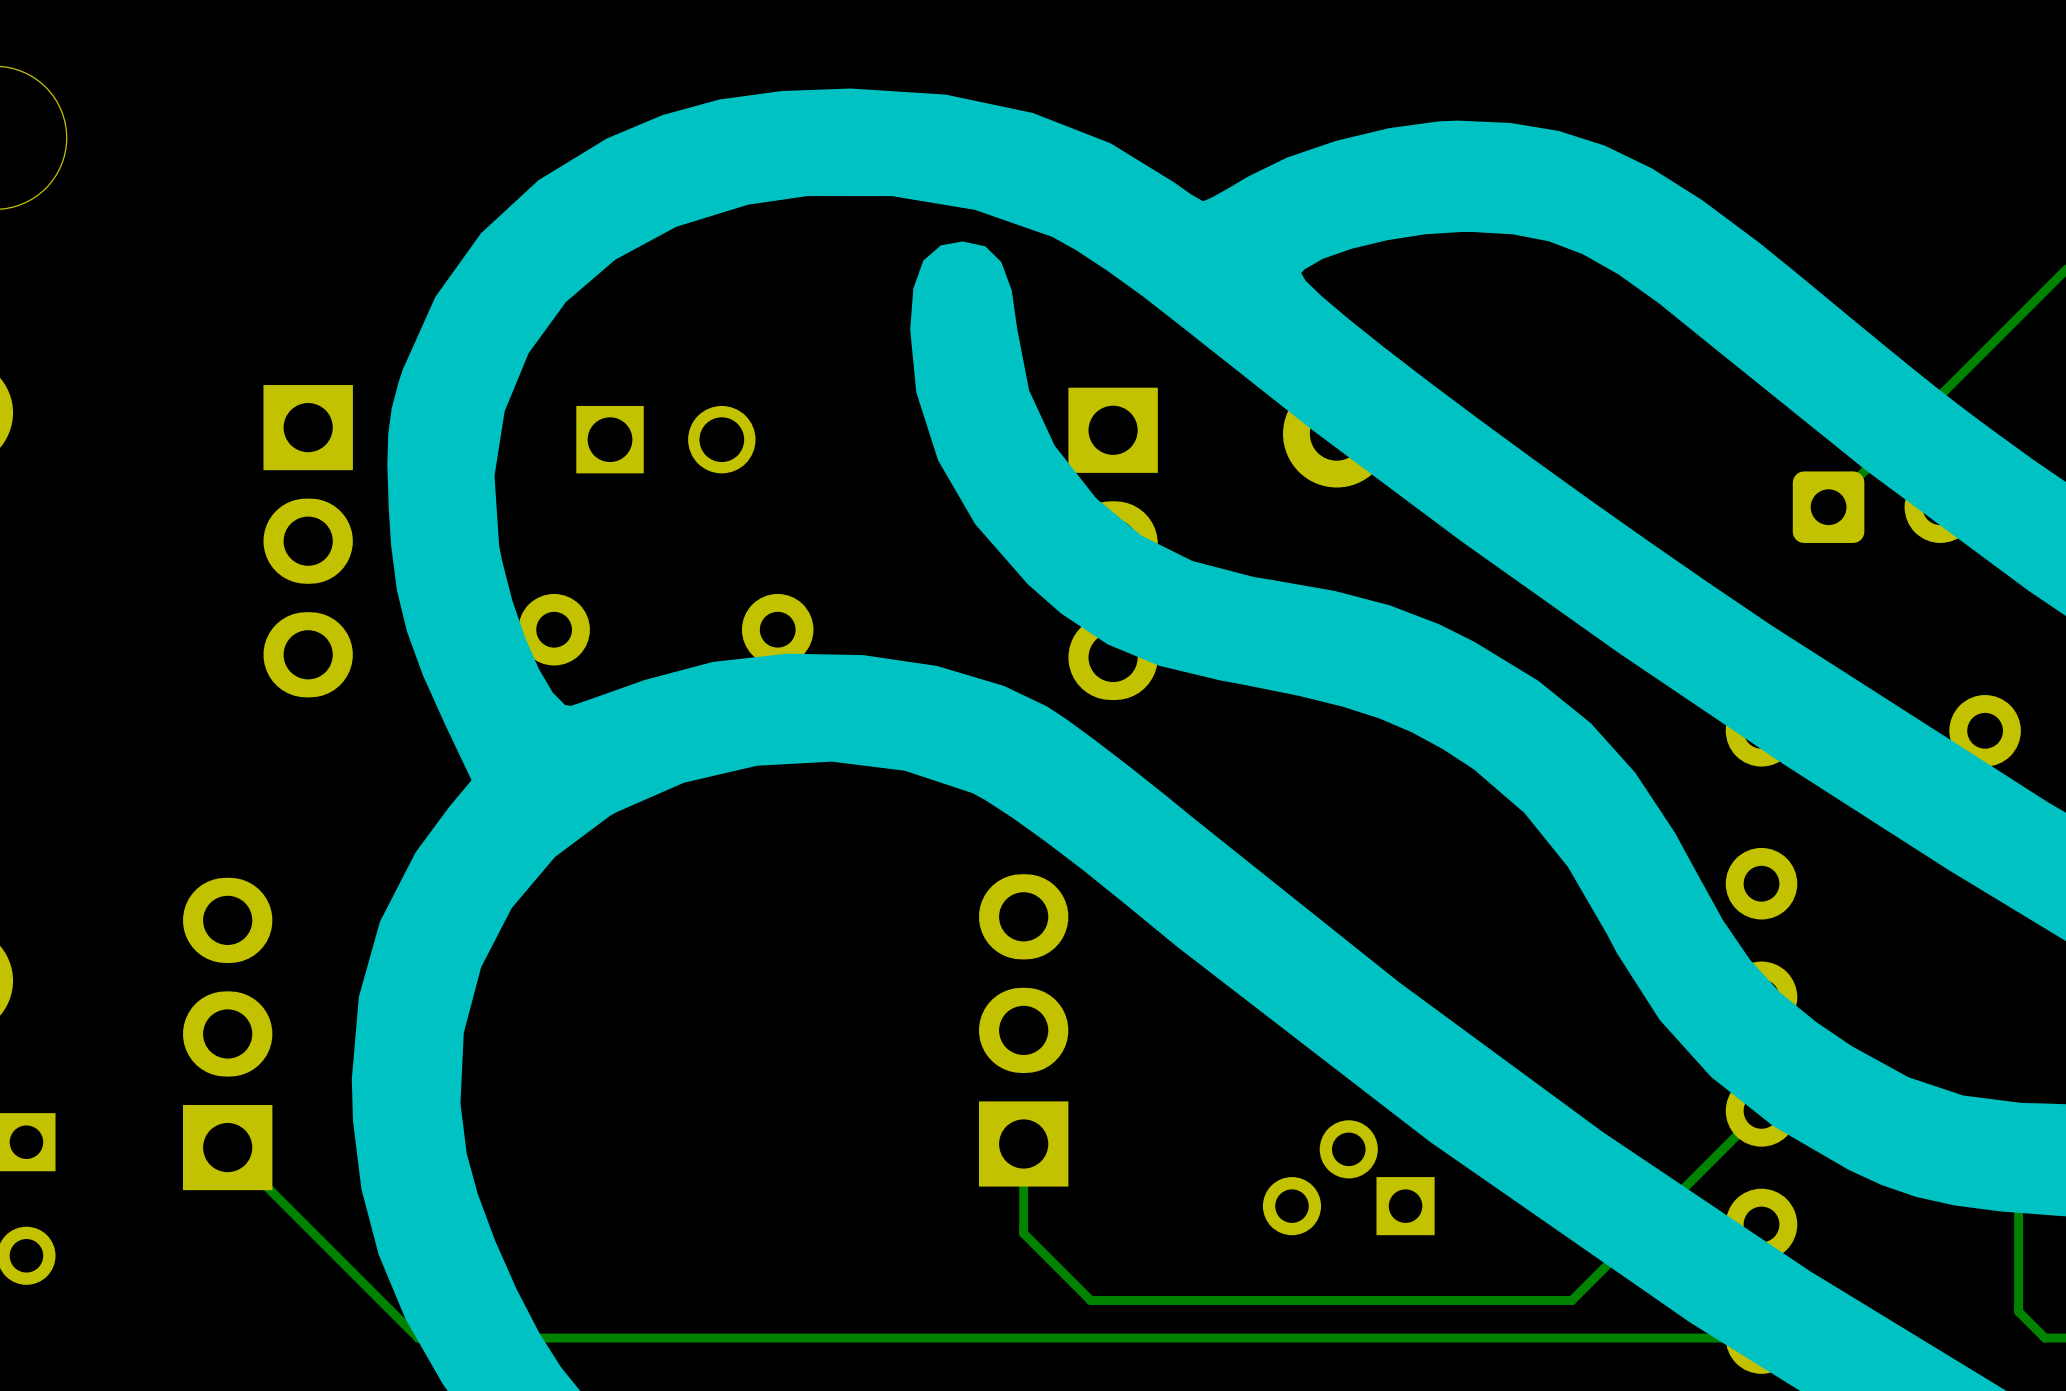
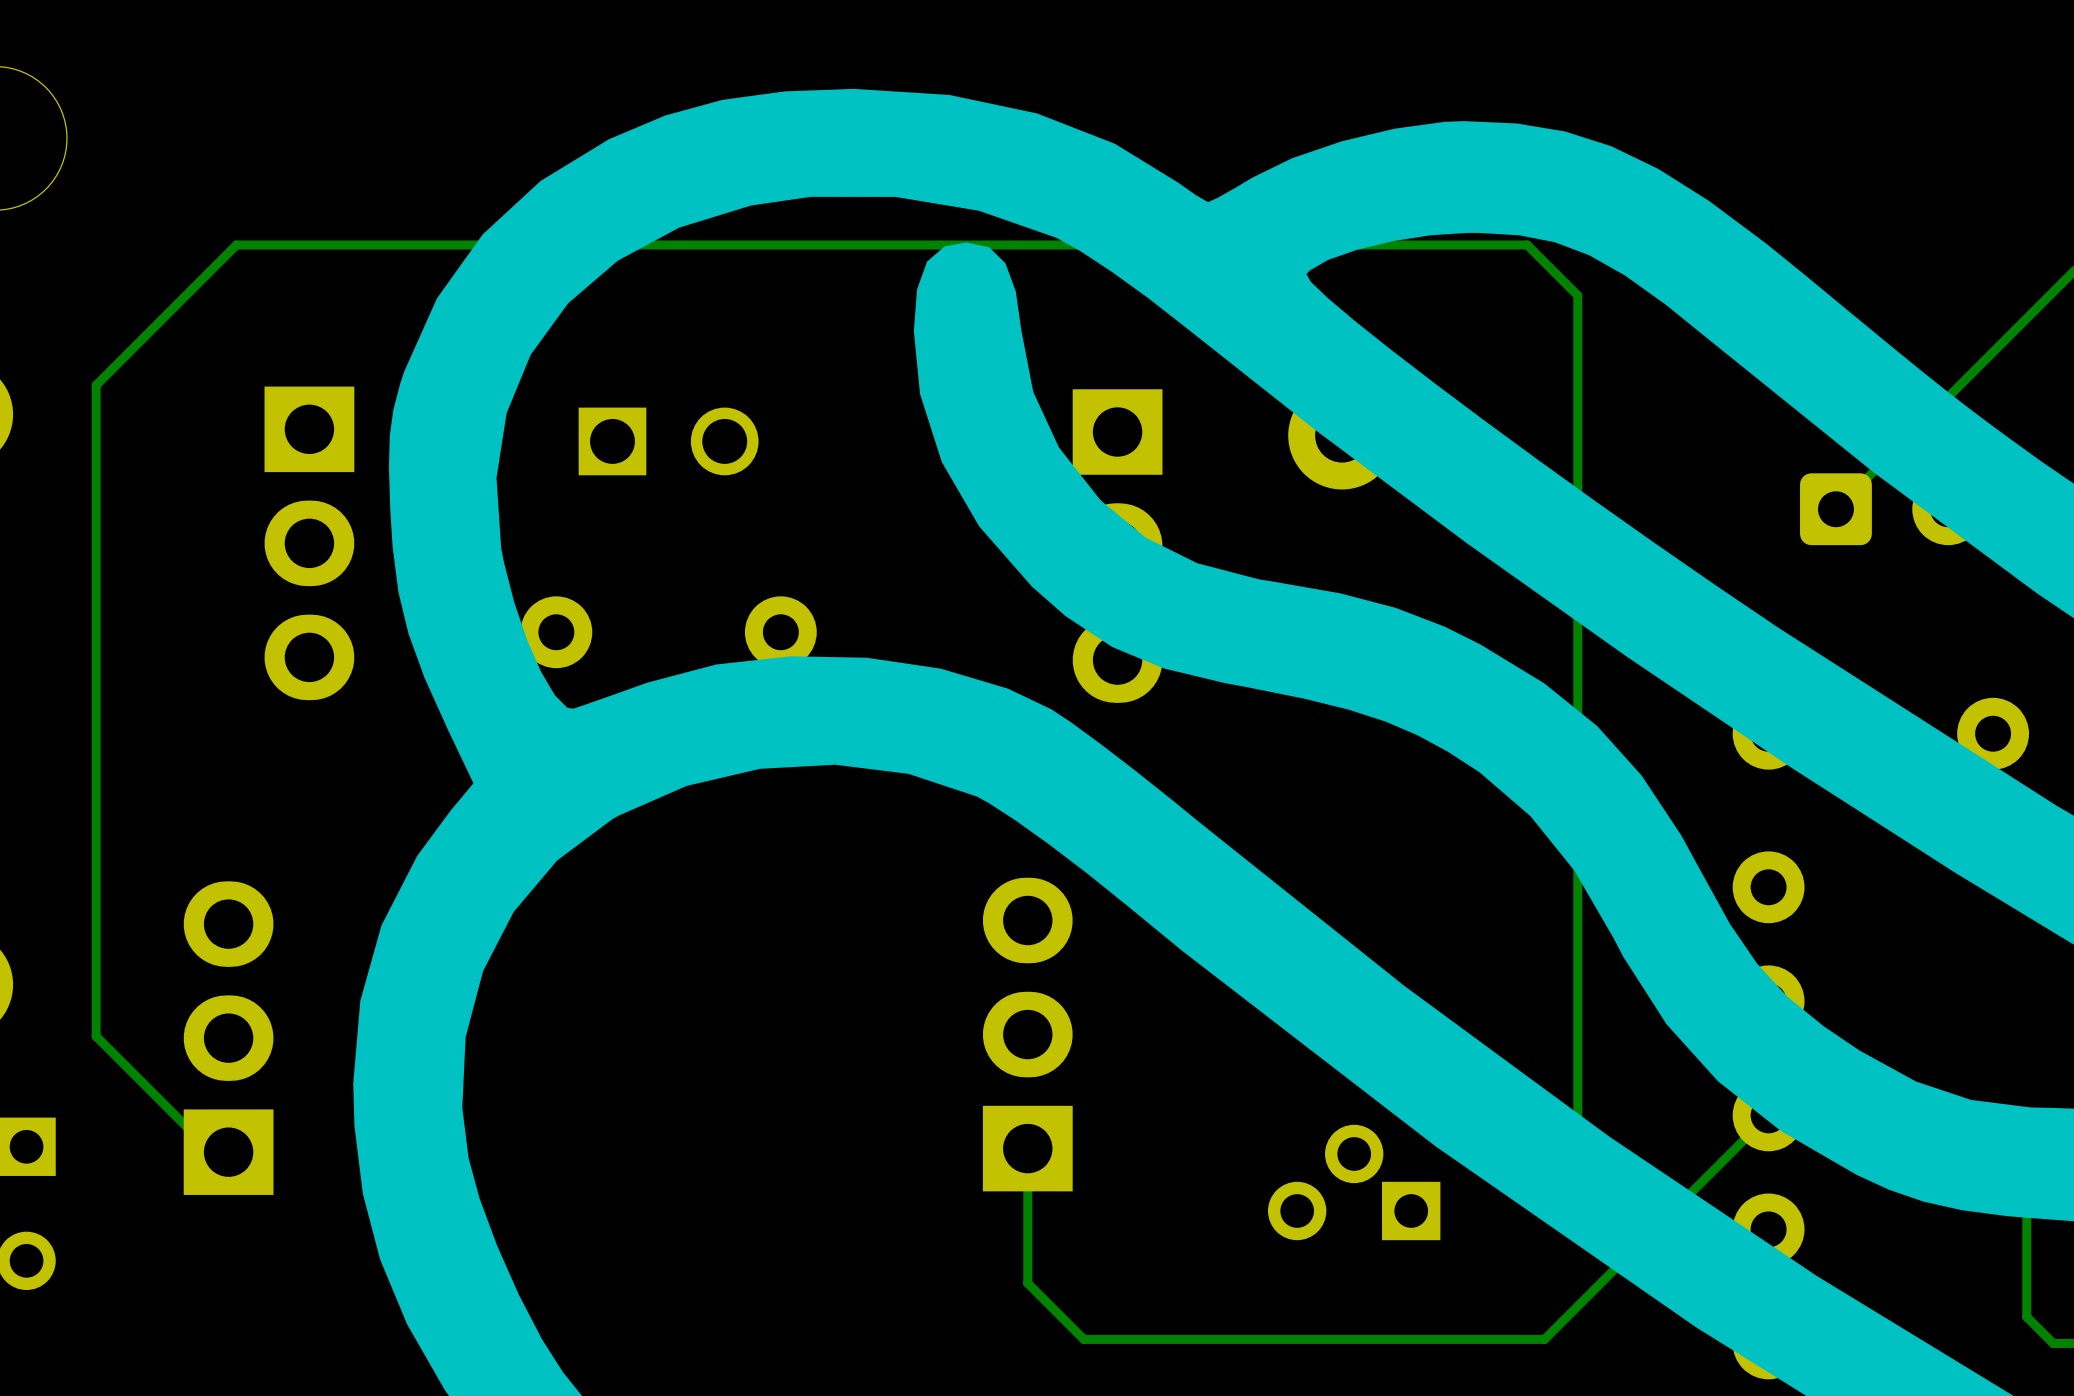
track: (227, 1147) (418, 1338) (1761, 1338) -> (228, 1152) (211, 1152) (96, 1036) (96, 385) (236, 245) (1527, 245) (1577, 295) (1577, 1171)
track: (1023, 1233) (1090, 1300) (1571, 1300) -> (1027, 1238) (1027, 1283) (1083, 1339) (1544, 1339) (1578, 1305)

